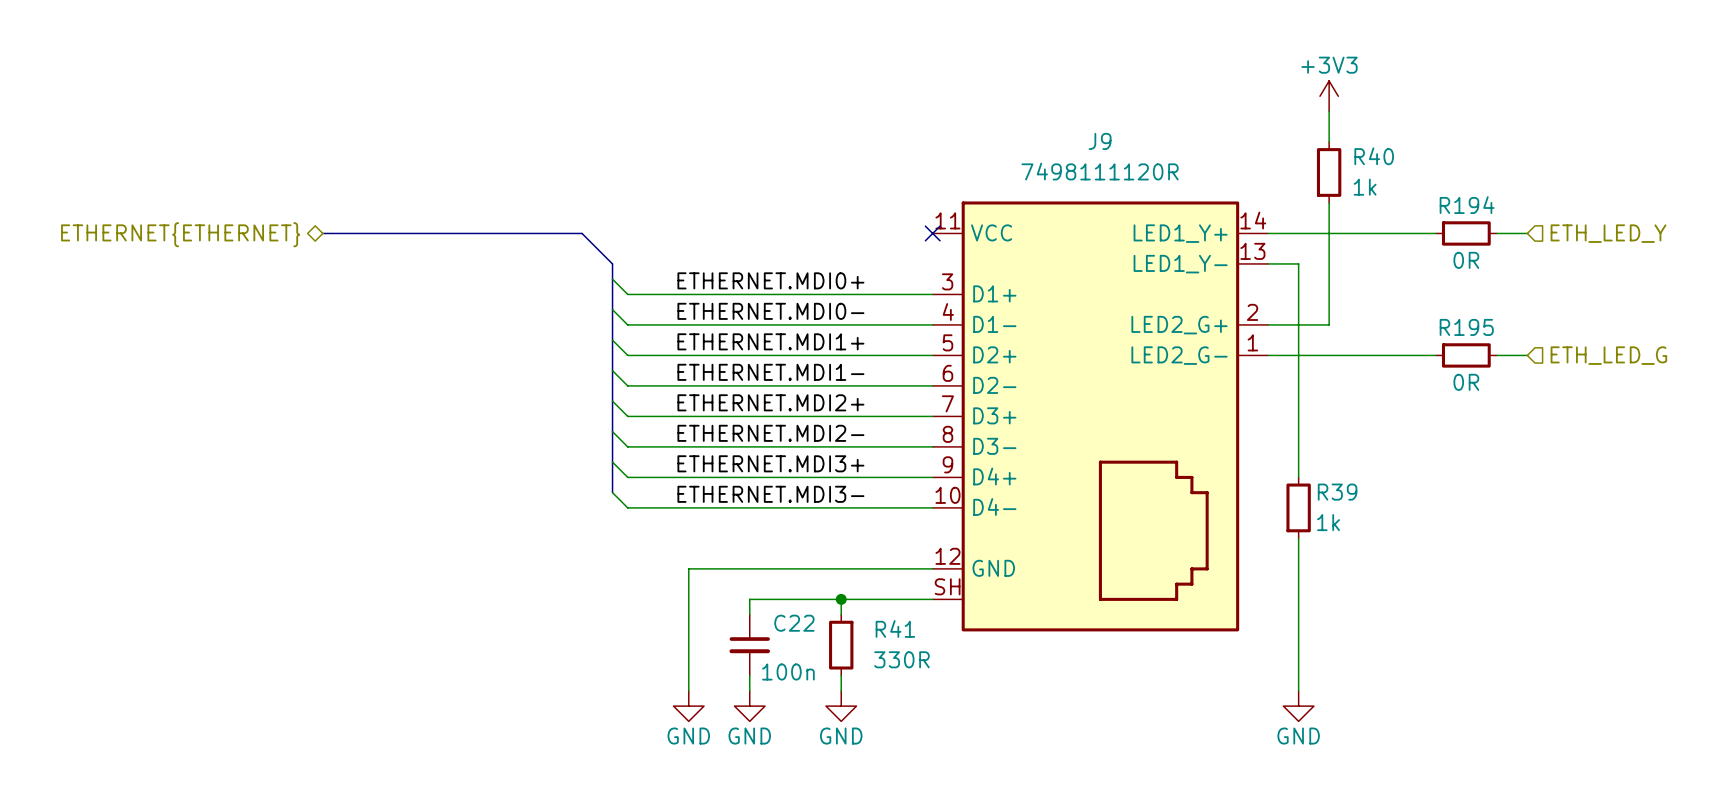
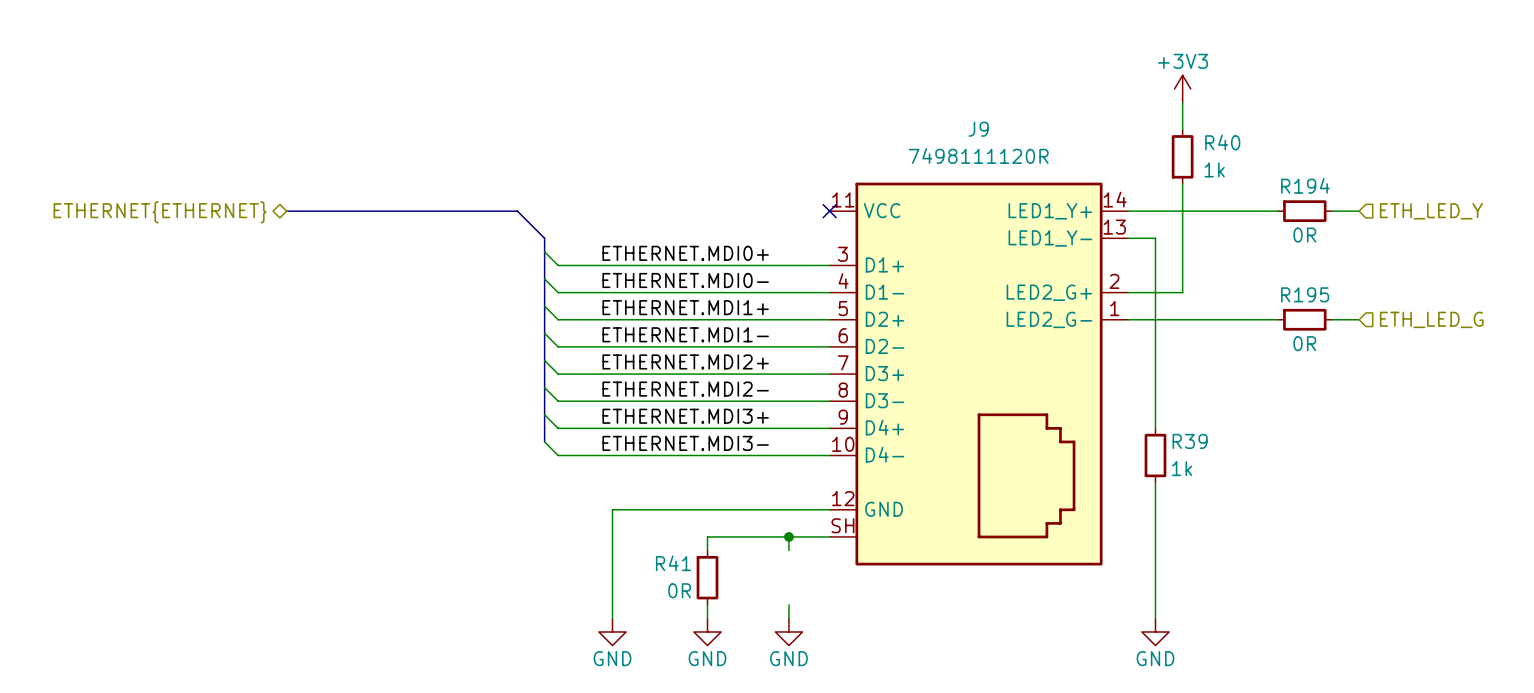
wire: (795, 599) (749, 599) (749, 614) -> (707, 536) (707, 550)
wire: (841, 599) (841, 614) -> (788, 536) (788, 550)
junction position: (841, 599) -> (788, 536)
R41 name position: R41 (895, 628) -> R41 (673, 563)
C22: (749, 645) -> none
R41 position: (841, 645) -> (707, 577)
R41 text: 330R (901, 659) -> 0R (679, 590)
wire: (749, 675) (749, 690) -> (707, 604) (707, 618)
wire: (841, 675) (841, 690) -> (788, 604) (788, 618)
power symbol: GND (749, 706) -> none
power symbol: none -> GND (707, 631)
power symbol: GND (841, 706) -> none
power symbol: none -> GND (788, 631)

